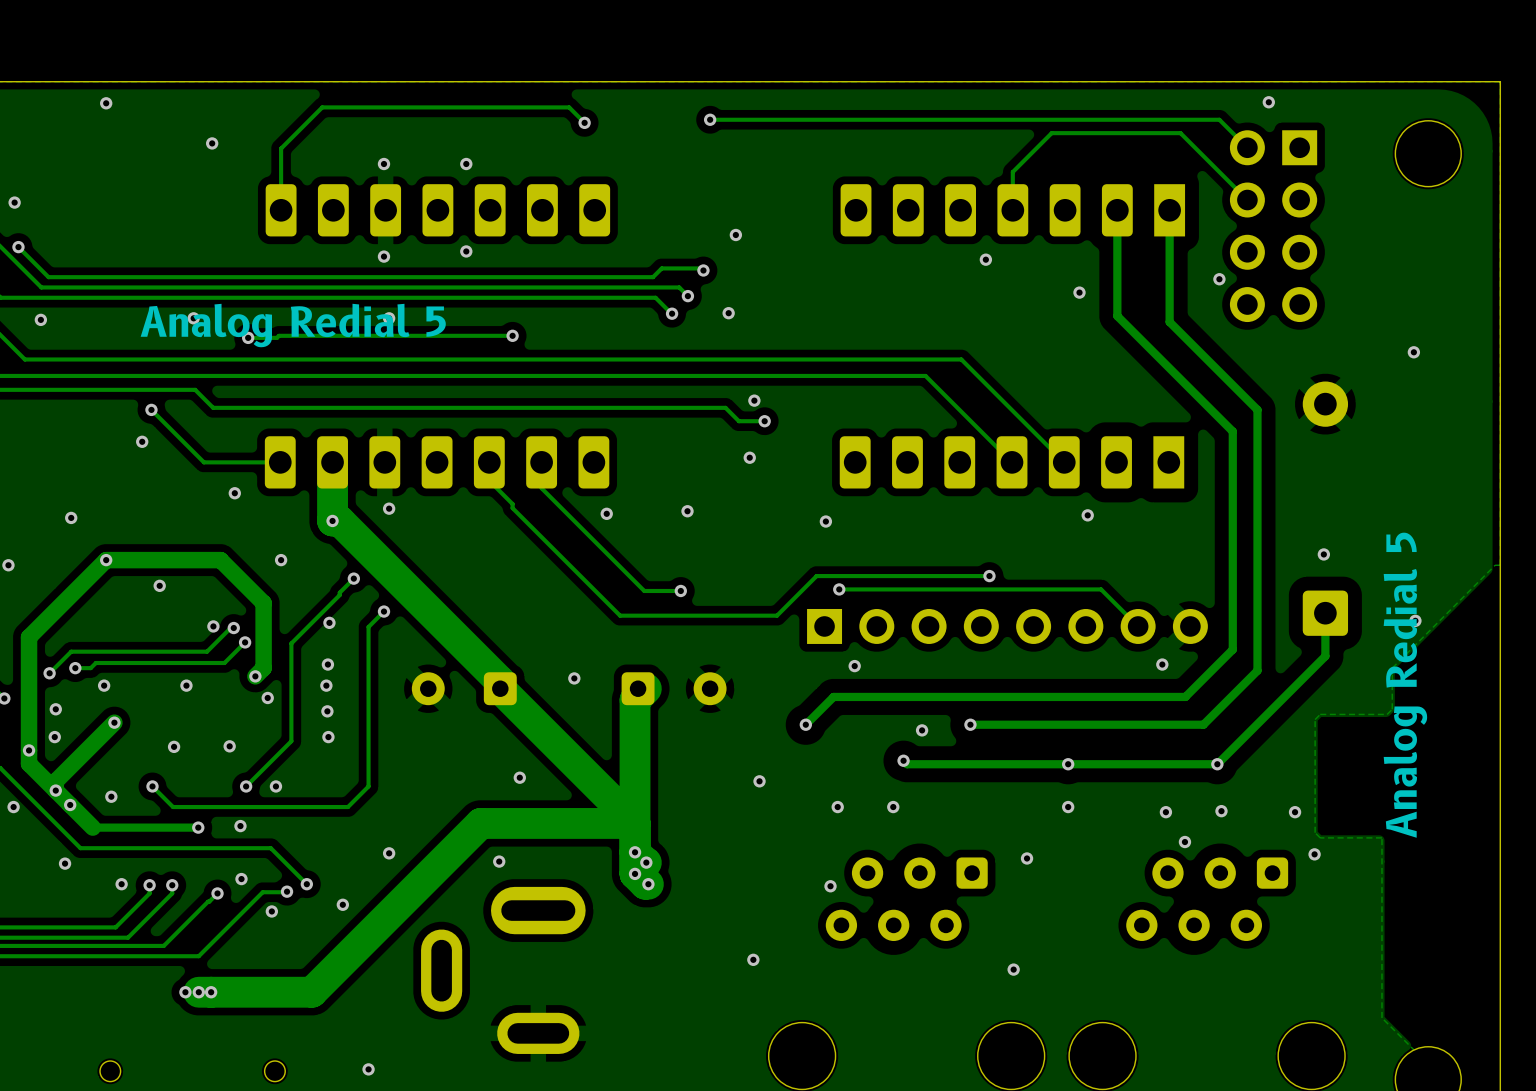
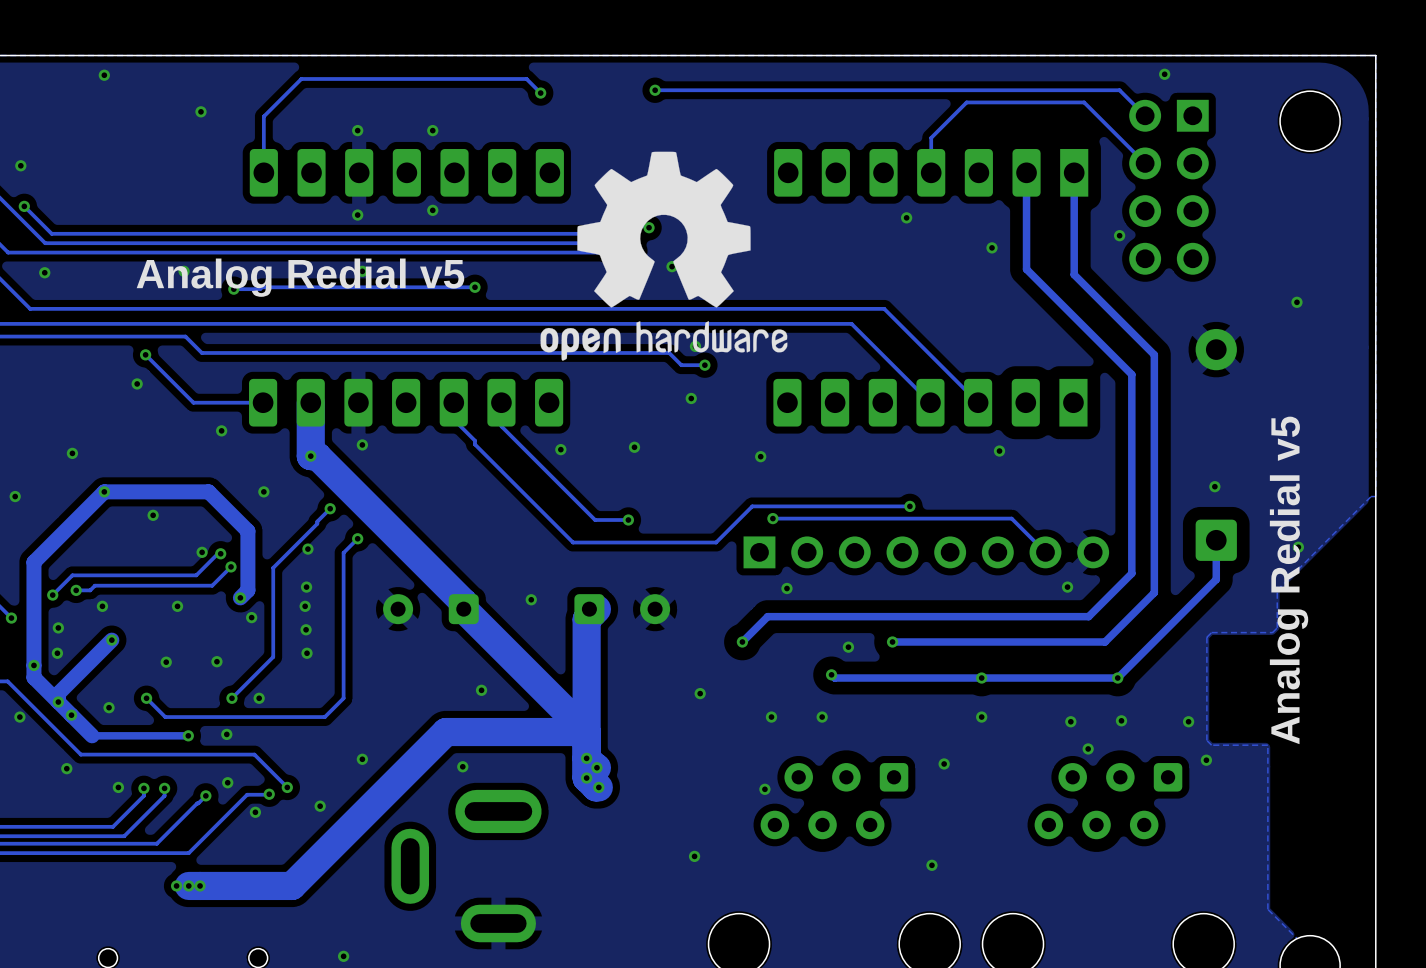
drawing: none -> [540, 151, 788, 361]
text: Analog Redial 5 (293, 325) -> Analog Redial v5 (300, 277)
text: Analog Redial 5 (1405, 685) -> Analog Redial v5 (1289, 580)

